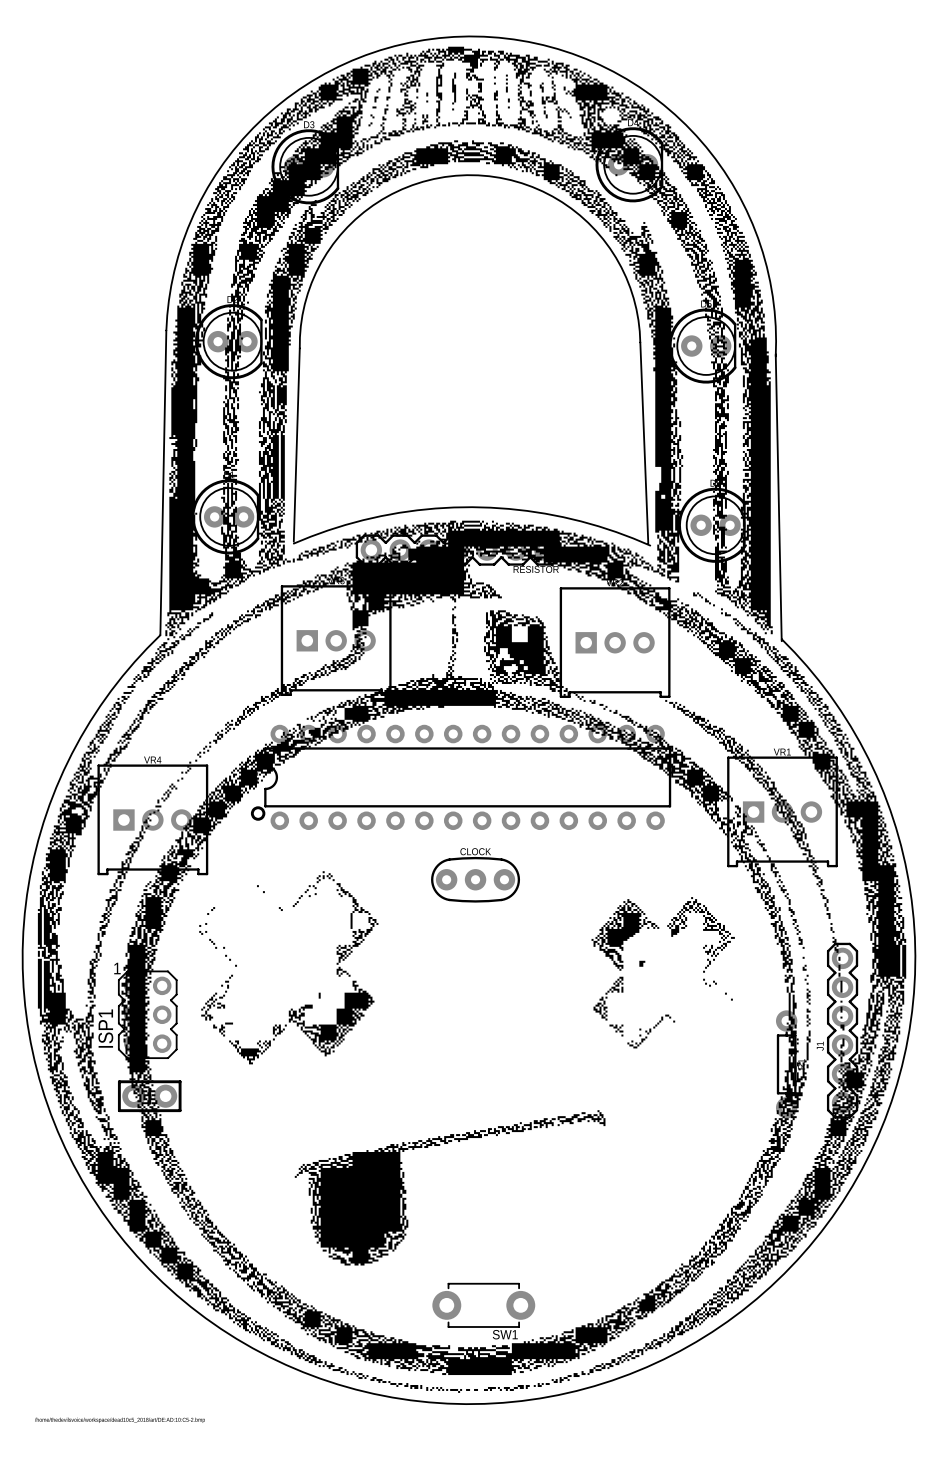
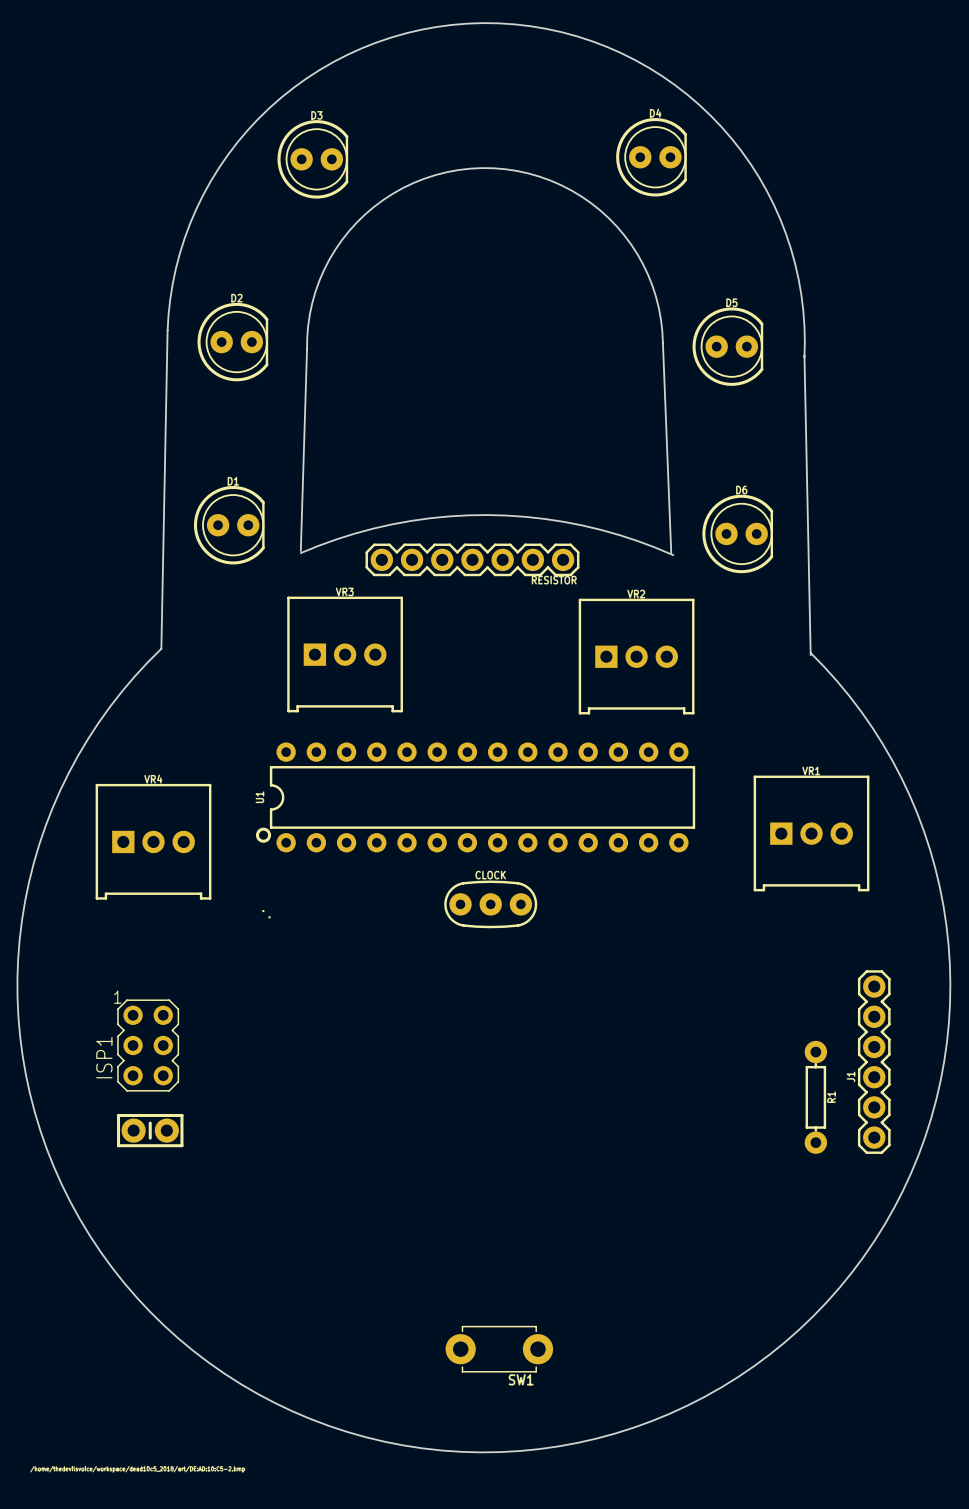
drawing: [37, 46, 907, 1393] -> none
drawing: [199, 871, 379, 1065] -> none
drawing: [591, 897, 735, 1049] -> none
drawing: [639, 960, 646, 967] -> none
drawing: [294, 1110, 606, 1266] -> none

